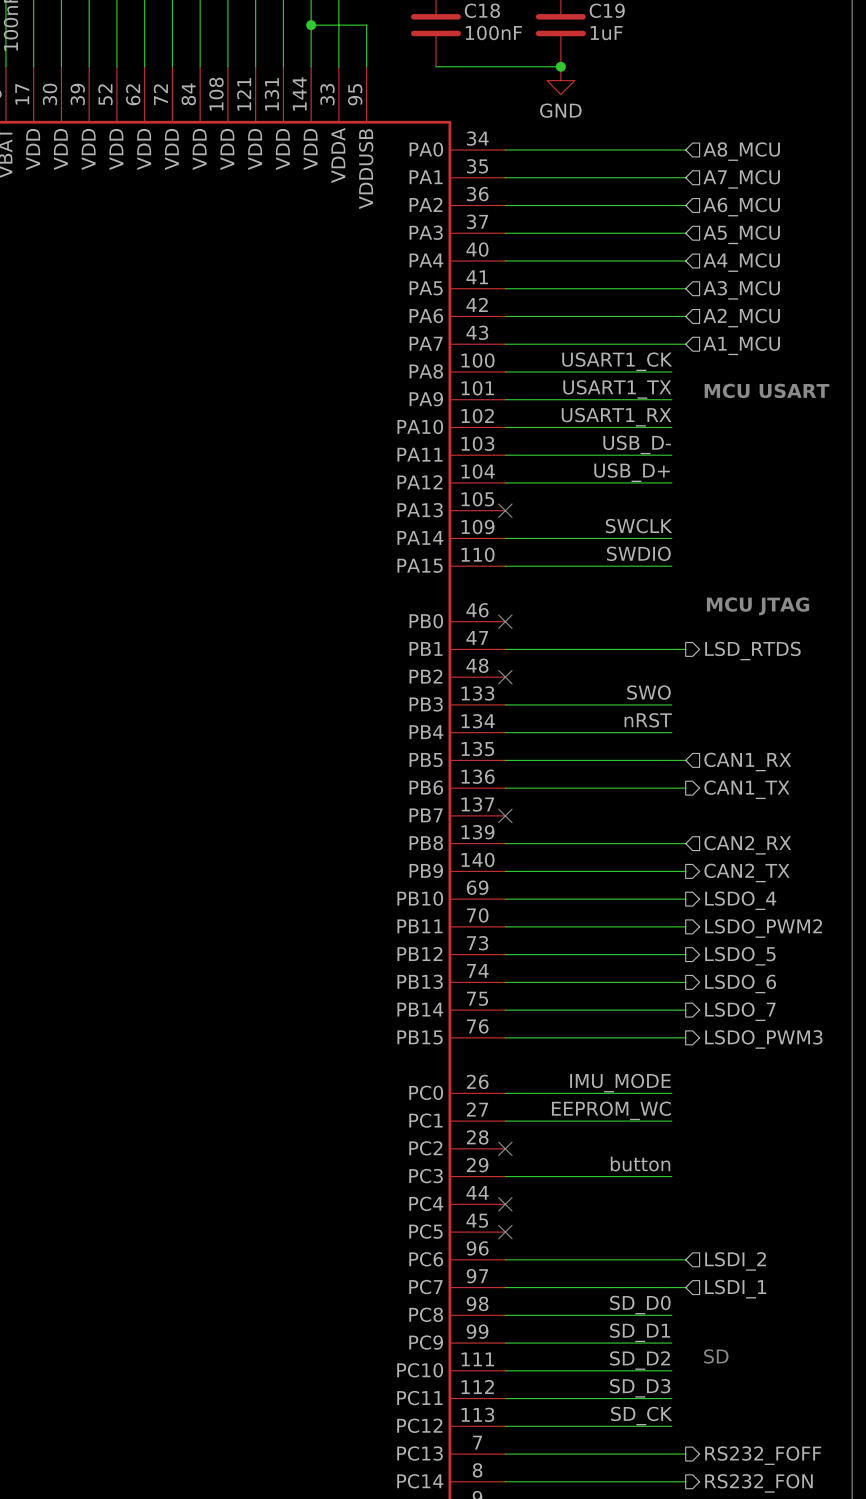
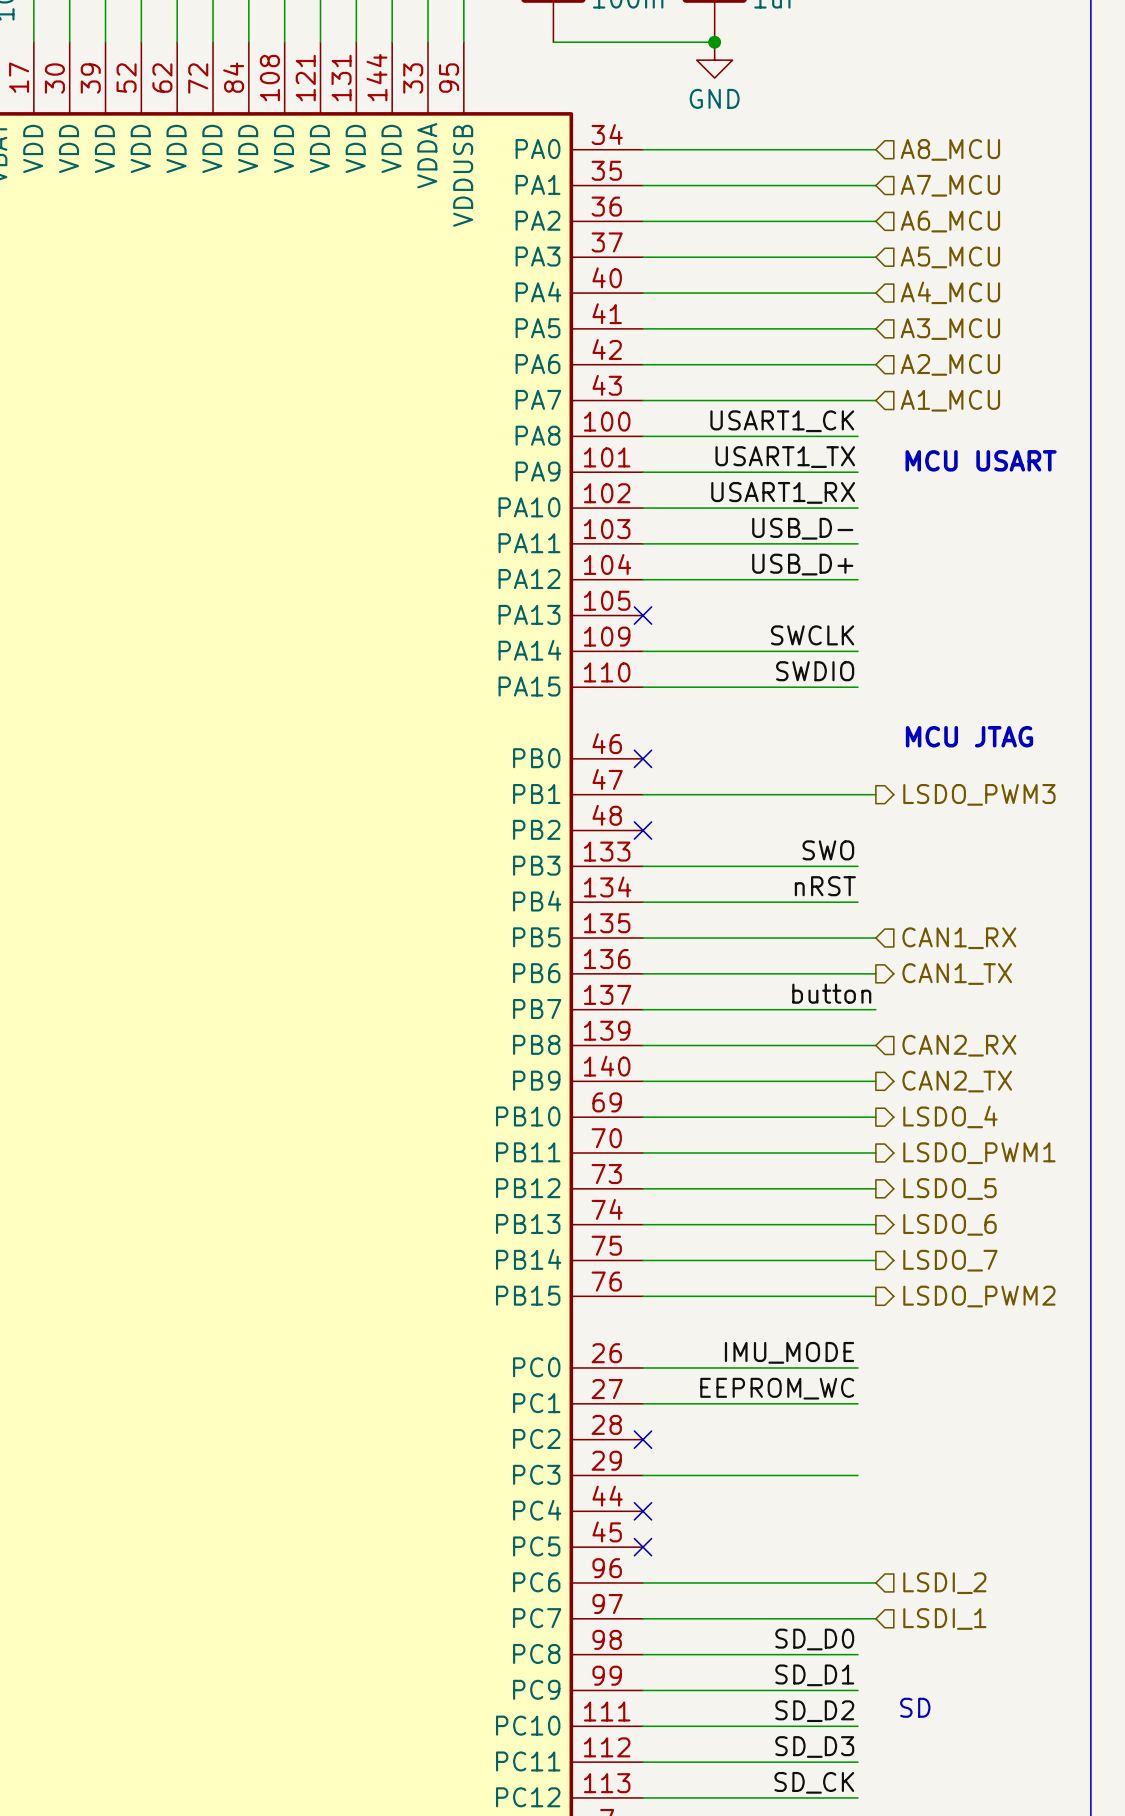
hierarchical label: LSD_RTDS (752, 651) -> LSDO_PWM3 (979, 794)
label: none -> button (831, 993)
wire: none -> (642, 1009) (875, 1009)
no-connect mark: (505, 815) -> none
hierarchical label: LSDO_PWM2 (763, 928) -> LSDO_PWM1 (979, 1153)
hierarchical label: LSDO_PWM3 (763, 1039) -> LSDO_PWM2 (979, 1296)
label: button (640, 1164) -> none

